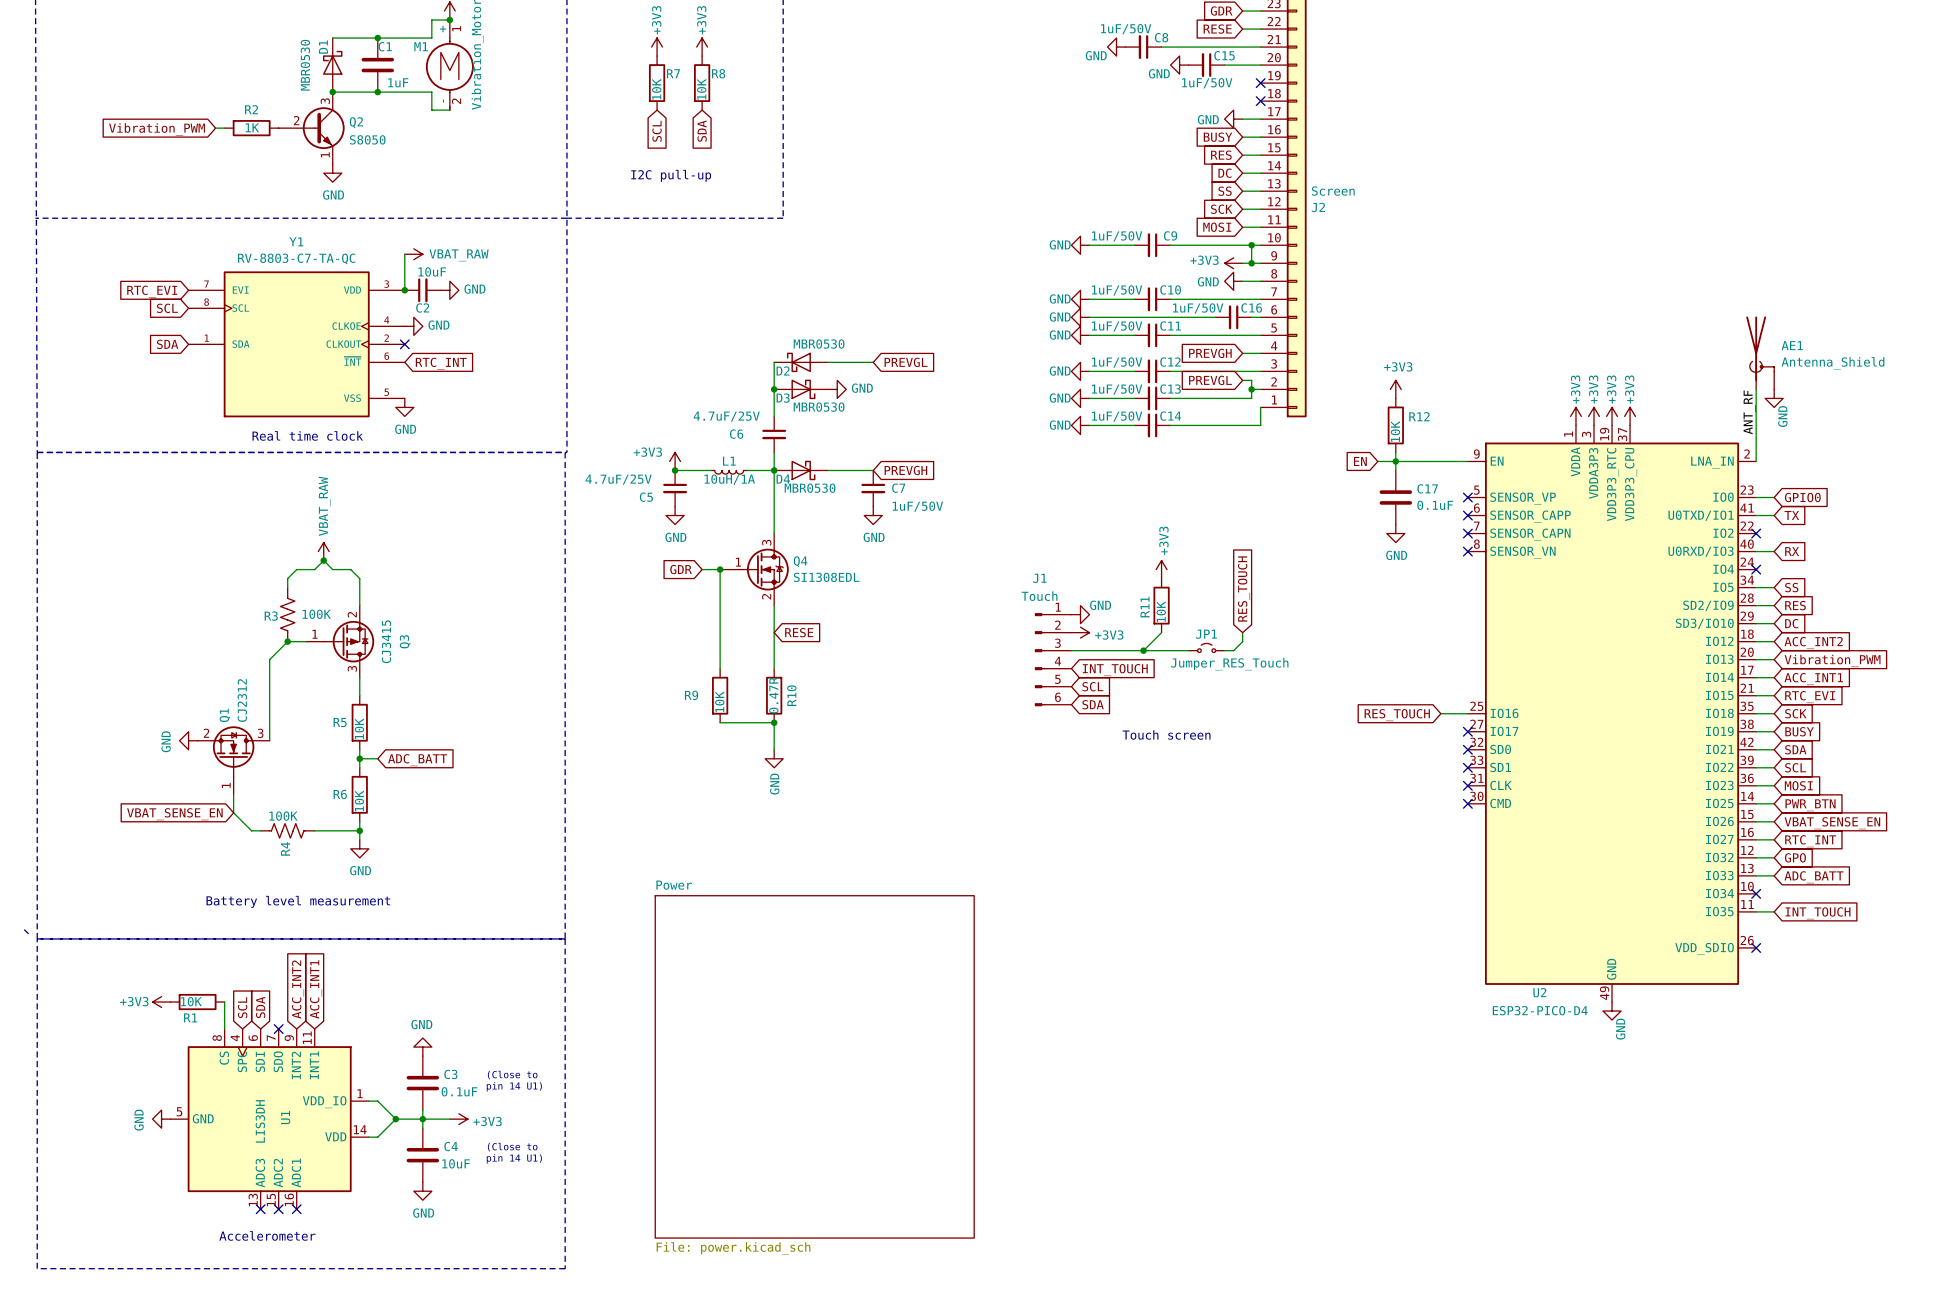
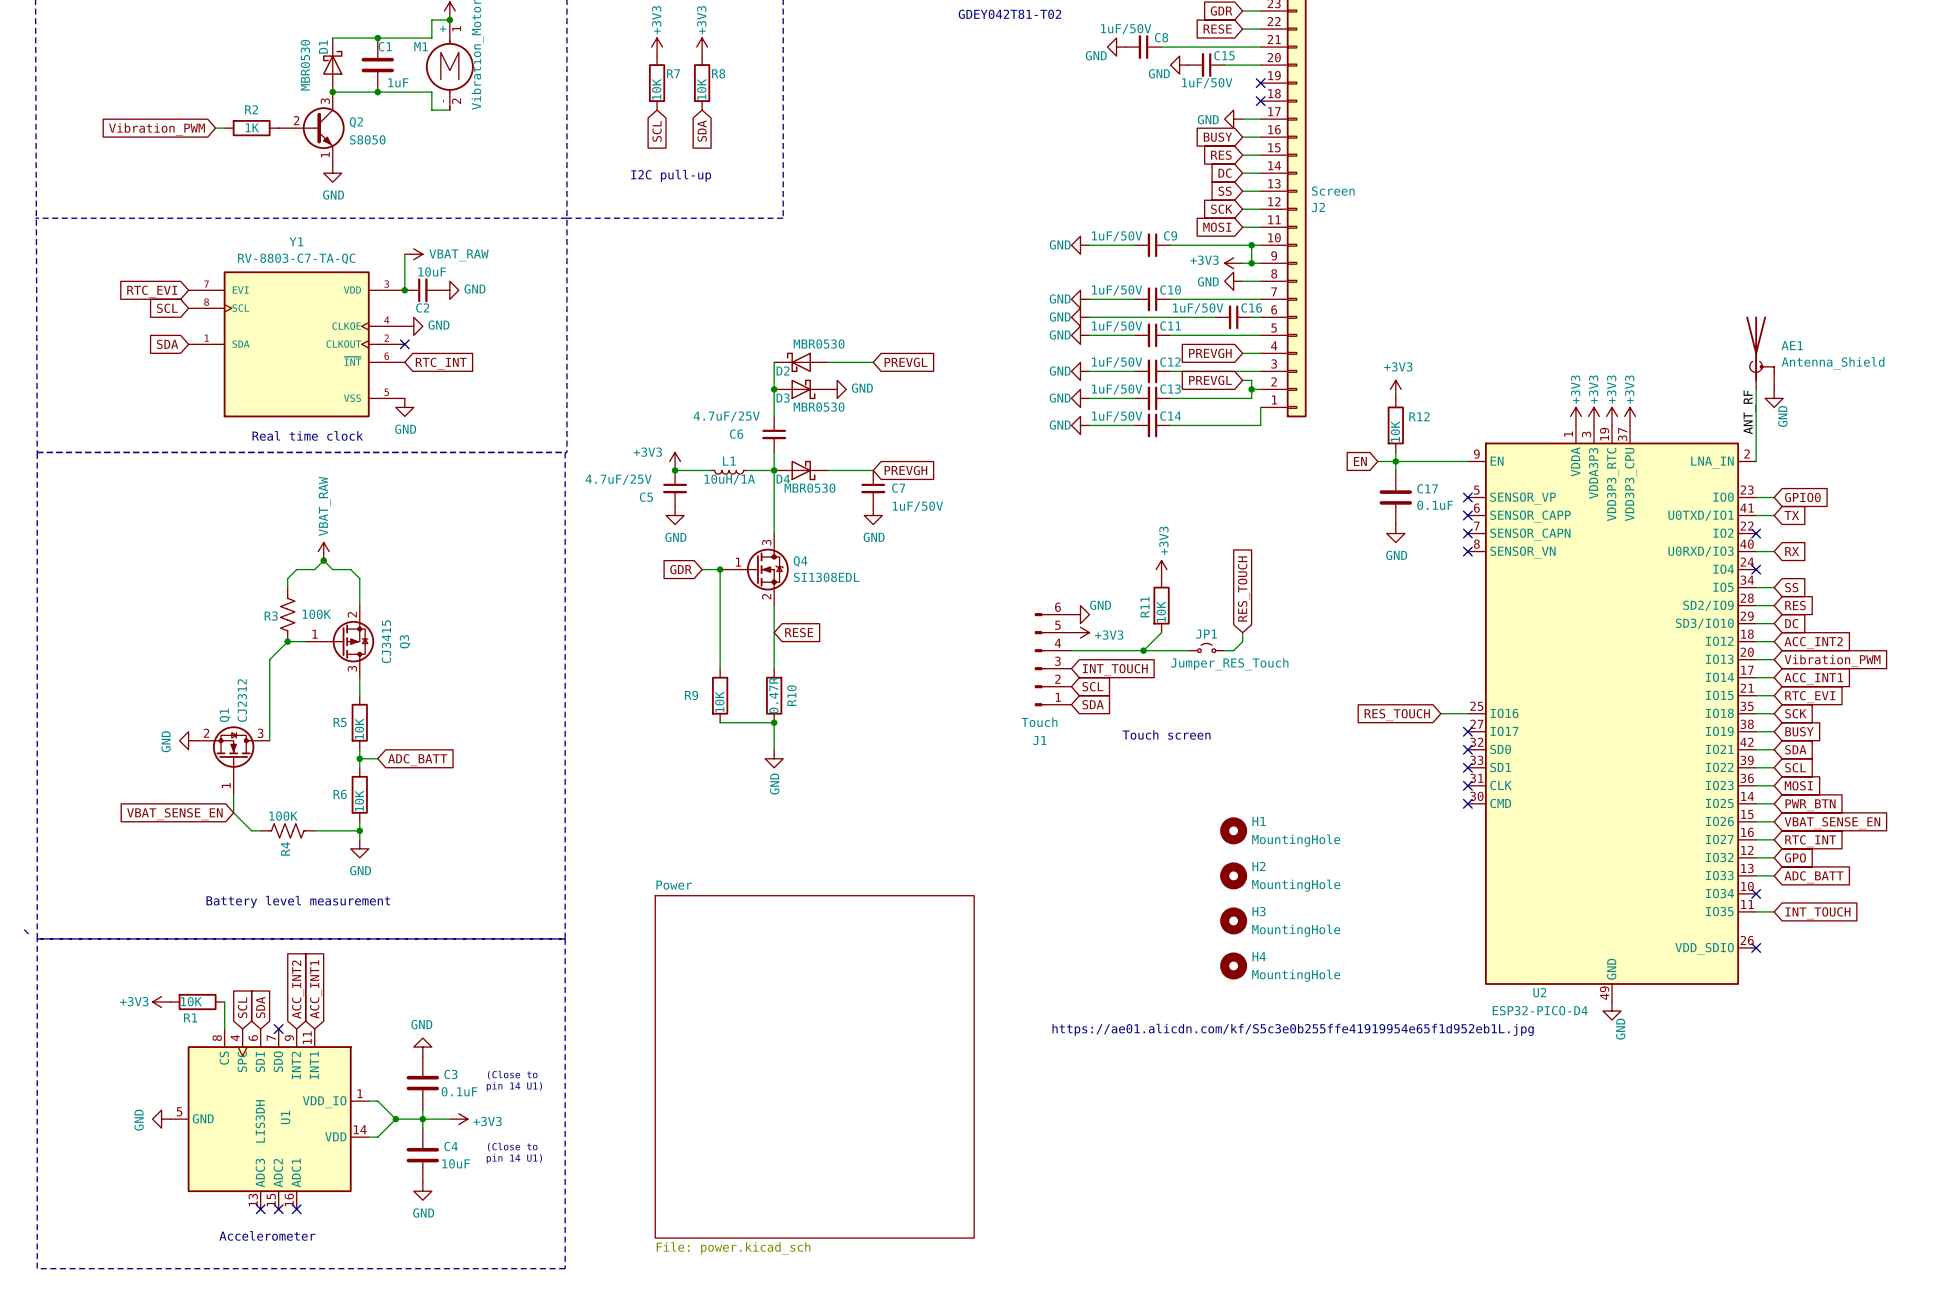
text: none -> GDEY042T81-T02 (1009, 14)
J1 flip: as is (1039, 659) -> up-down (1039, 659)
H1: none -> MountingHole (1233, 830)
H2: none -> MountingHole (1233, 875)
H3: none -> MountingHole (1233, 920)
H4: none -> MountingHole (1233, 965)
text: none -> https://ae01.alicdn.com/kf/S5c3e0b255ffe41919954e65f1d952eb1L.jpg (1293, 1029)

